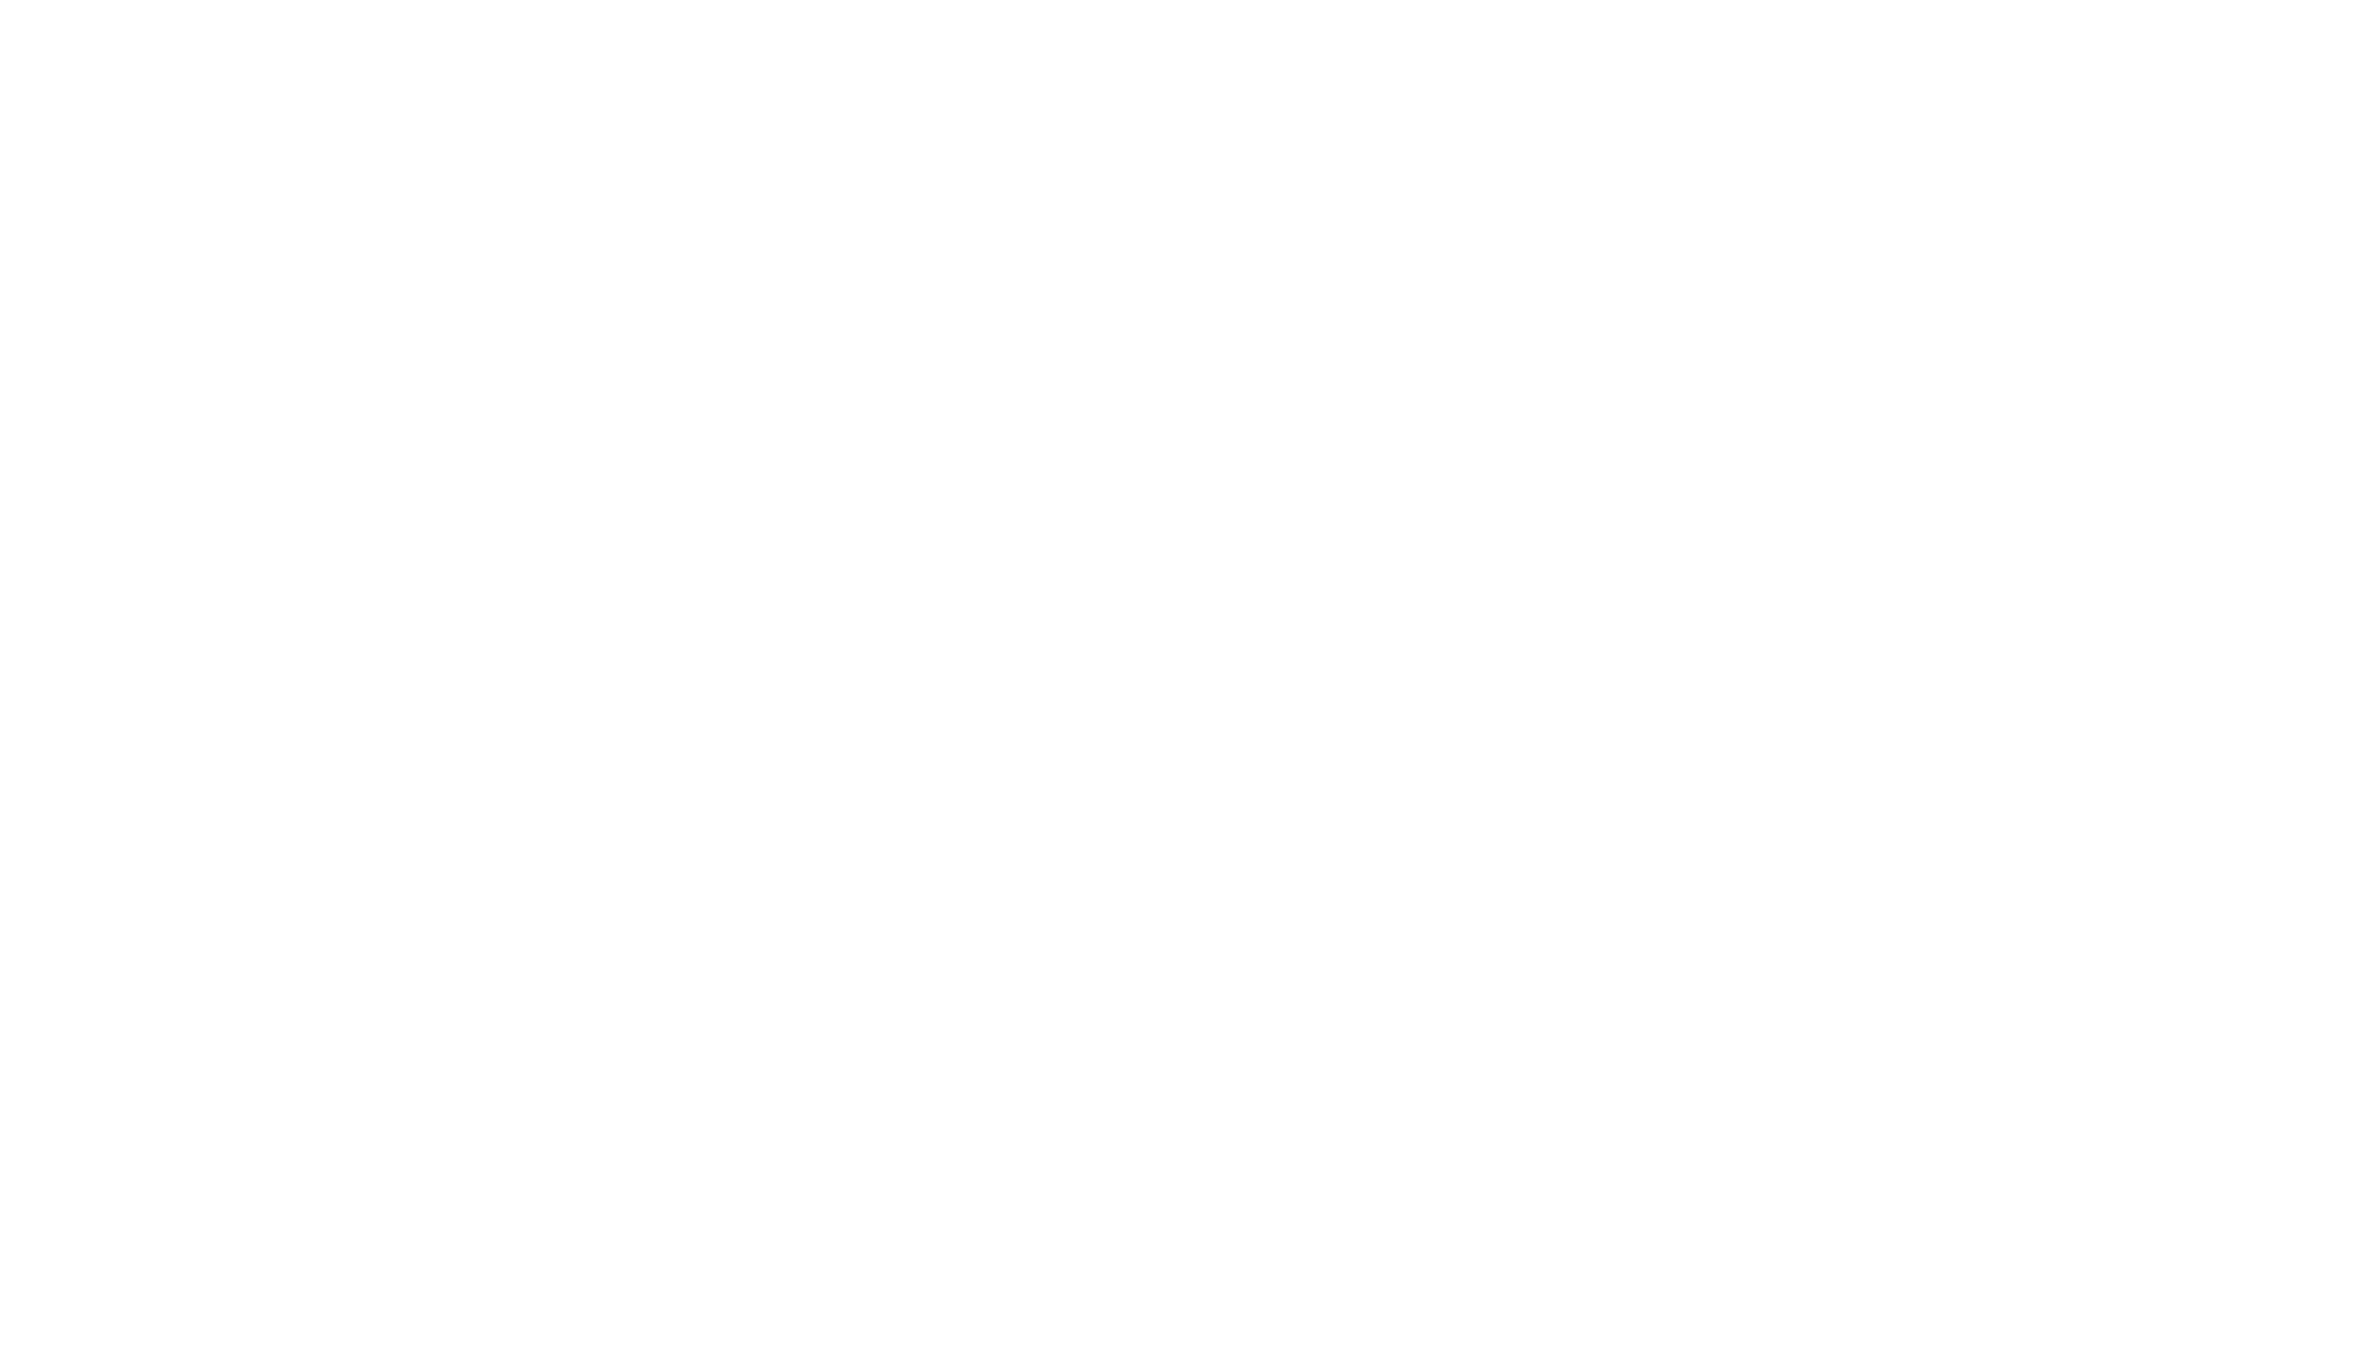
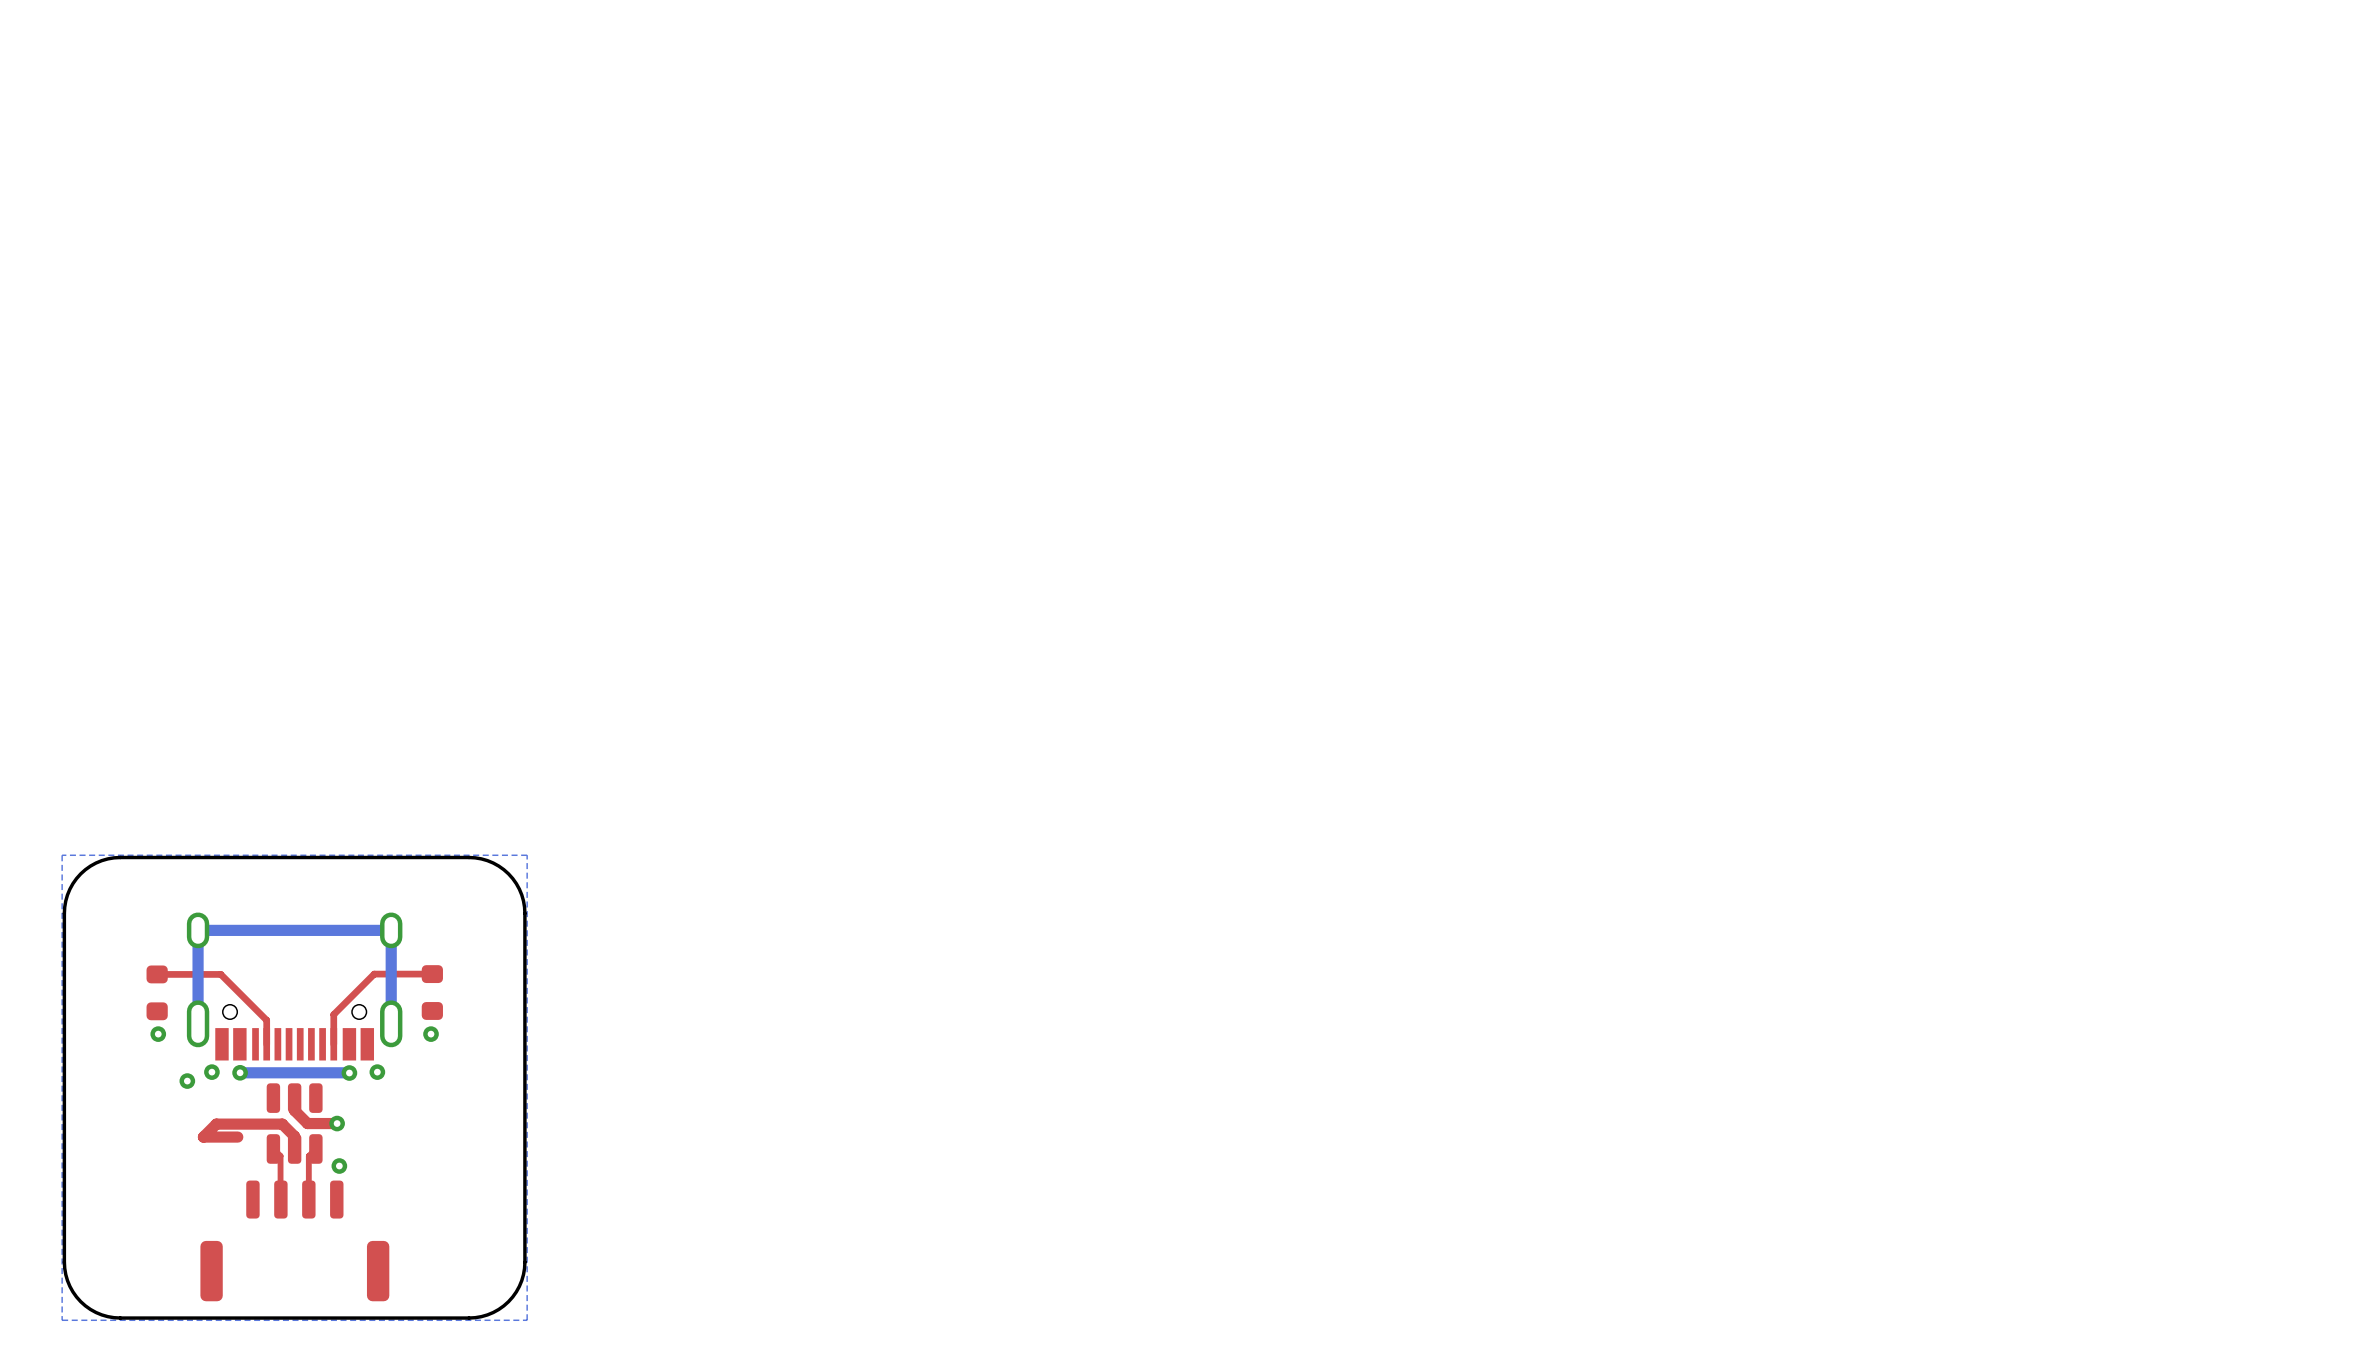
bottom zone outline: none -> (527, 855) (527, 1320) (62, 1320) (62, 855) (527, 855)
board edge: none -> (469, 857) (120, 857) (96, 863) (76, 878) (67, 894) (64, 913) (64, 1262) (69, 1286) (85, 1305) (101, 1314) (120, 1318) (469, 1318) (493, 1312) (512, 1297) (521, 1280) (524, 1262) (524, 907) (519, 889) (508, 873) (493, 863) (469, 857)
top track: none -> (157, 974) (220, 974) (266, 1020) (266, 1044)
top track: none -> (432, 974) (374, 974) (333, 1014) (333, 1044)
part: none -> (294, 986)
part: none -> (157, 992)
part: none -> (432, 992)
bottom track: none -> (391, 1023) (391, 930) (198, 930) (198, 1023)
via: none -> (158, 1034)
via: none -> (431, 1034)
via: none -> (211, 1072)
via: none -> (240, 1072)
bottom track: none -> (349, 1072) (240, 1072)
via: none -> (377, 1072)
via: none -> (349, 1073)
via: none -> (187, 1081)
top track: none -> (294, 1098) (294, 1110) (307, 1123) (337, 1123)
part: none -> (294, 1123)
via: none -> (337, 1123)
top track: none -> (237, 1137) (203, 1137) (216, 1124) (282, 1124) (294, 1136) (294, 1148)
top track: none -> (273, 1148) (280, 1155) (280, 1199)
top track: none -> (315, 1148) (308, 1156) (308, 1199)
via: none -> (339, 1166)
part: none -> (294, 1240)

